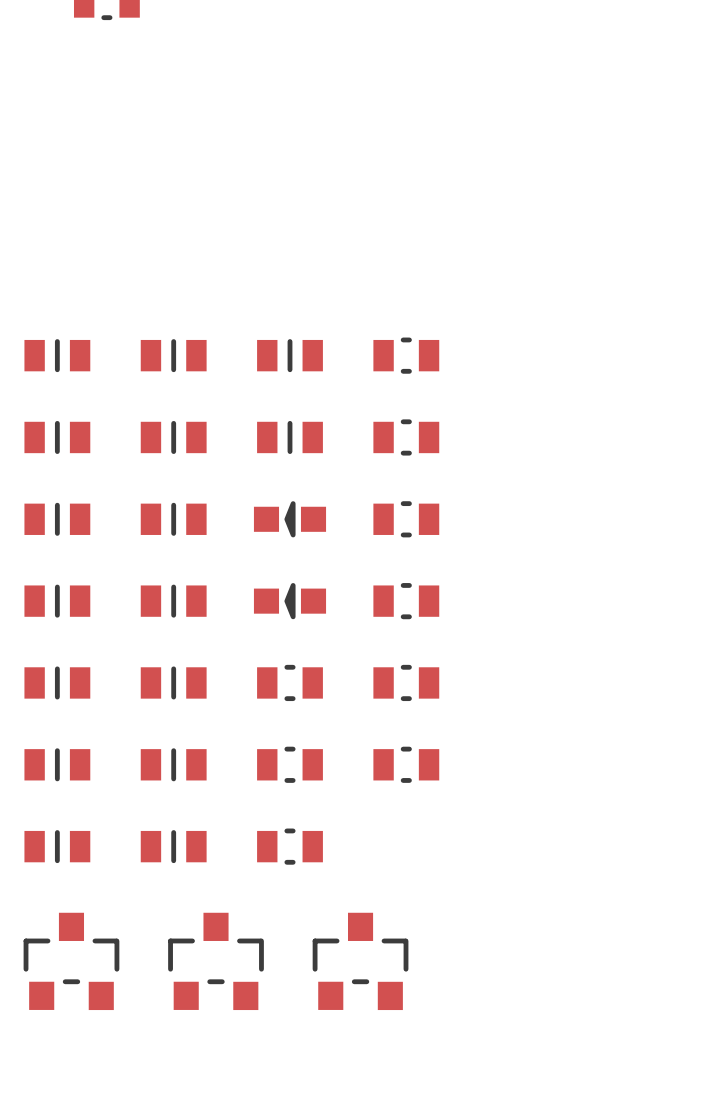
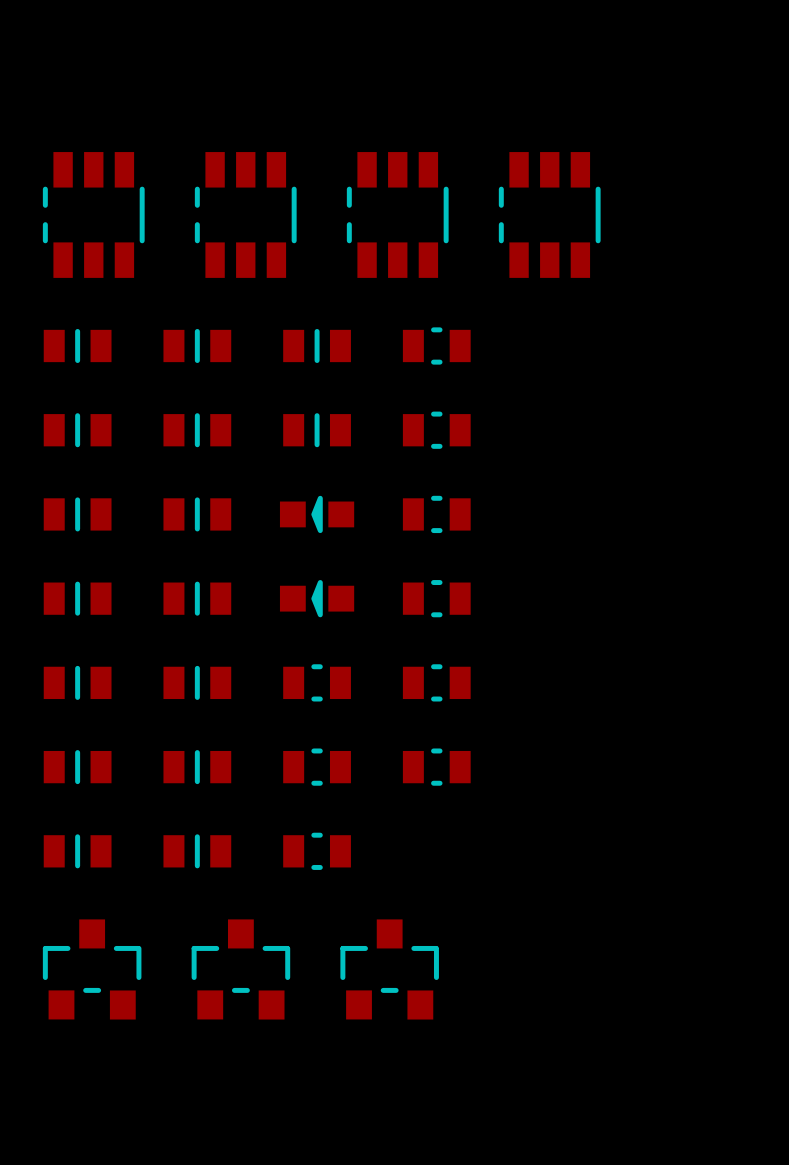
part: none -> (93, 214)
part: none -> (245, 214)
part: none -> (397, 214)
part: none -> (549, 214)

